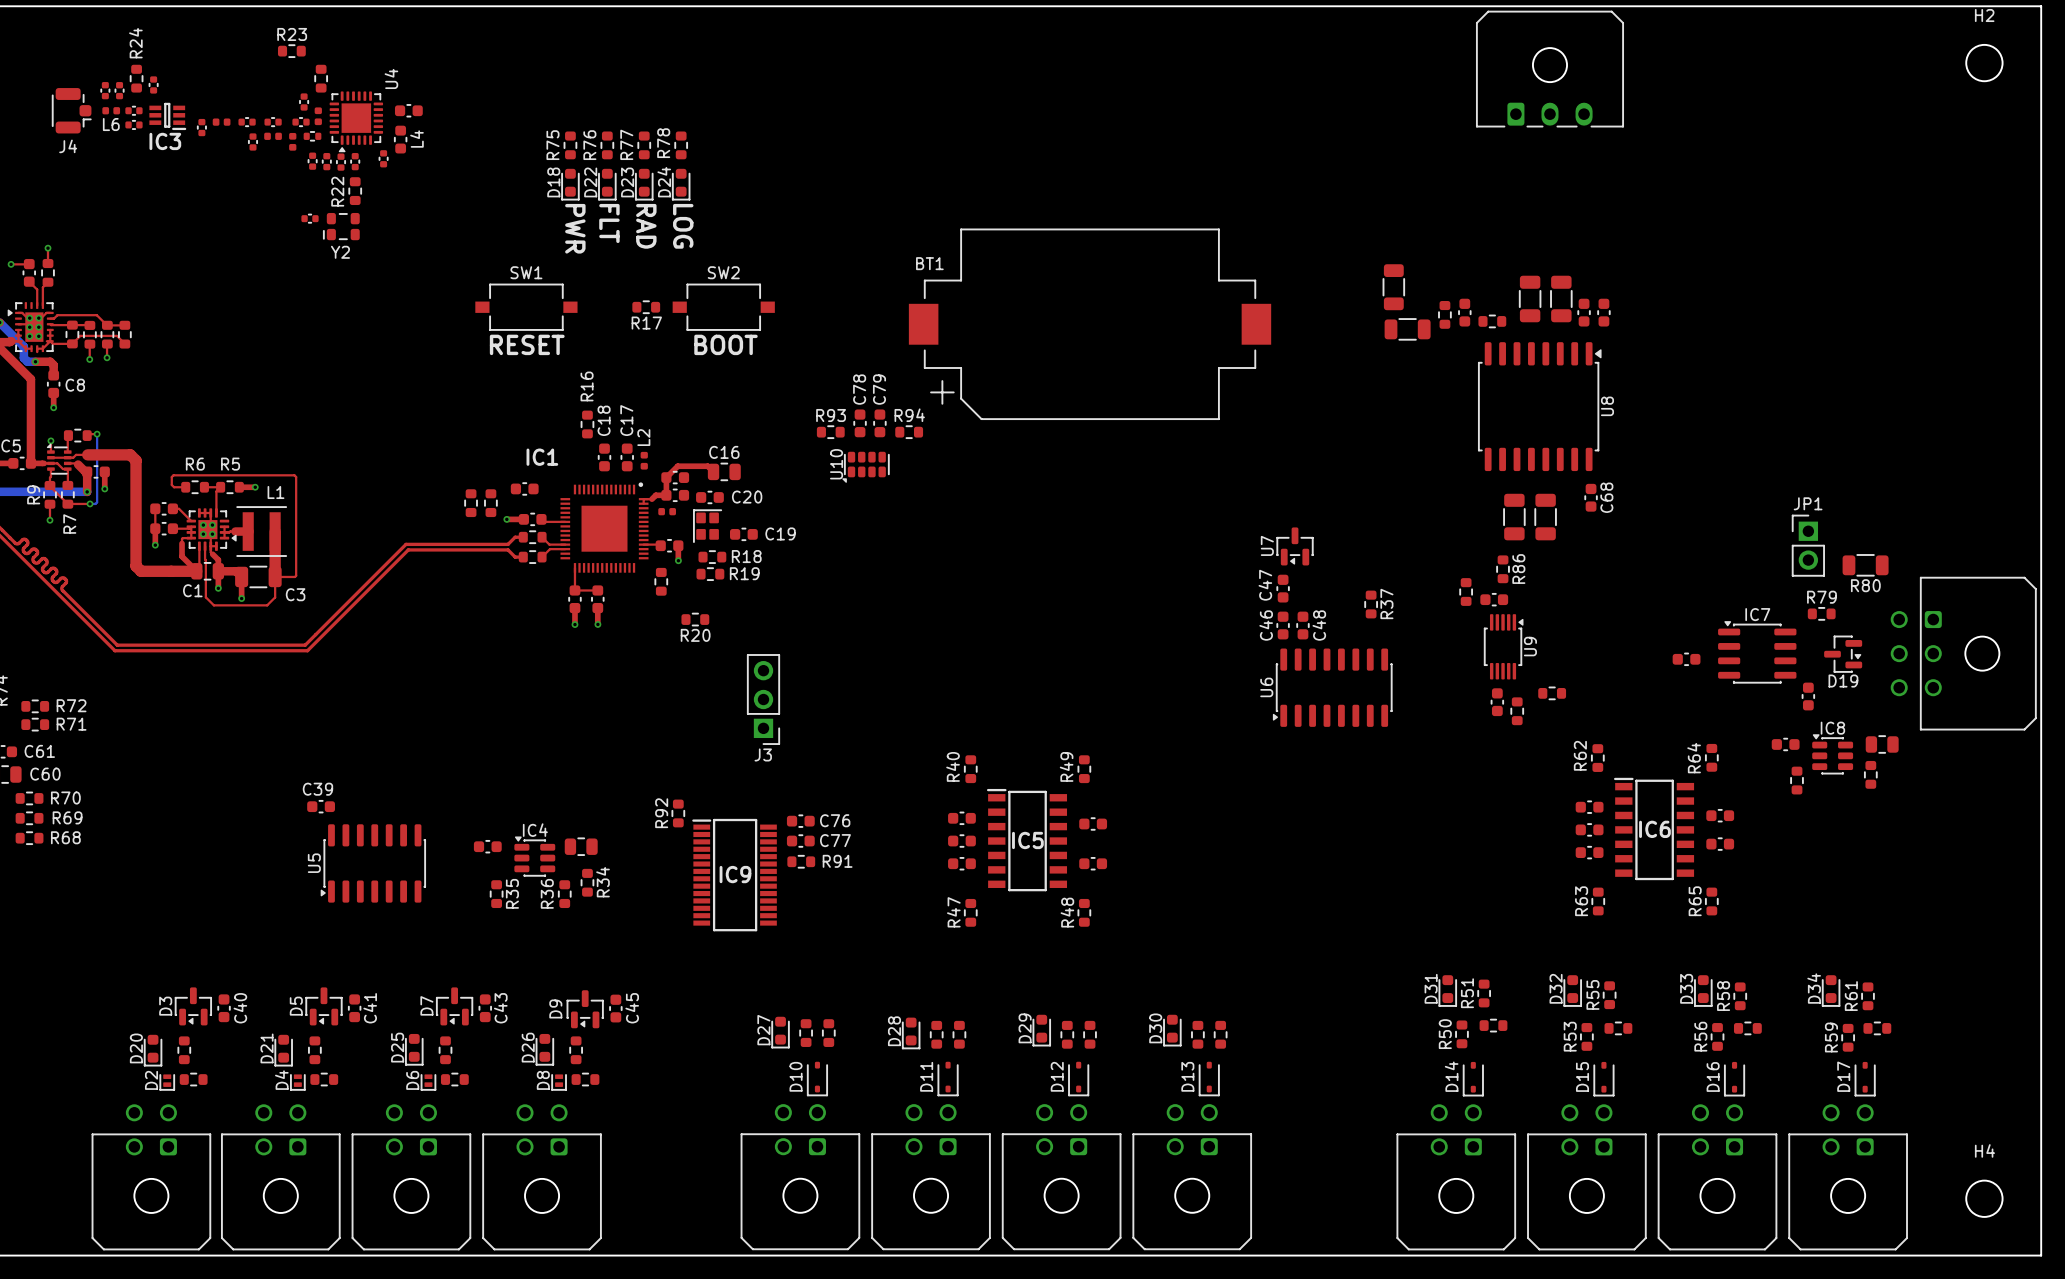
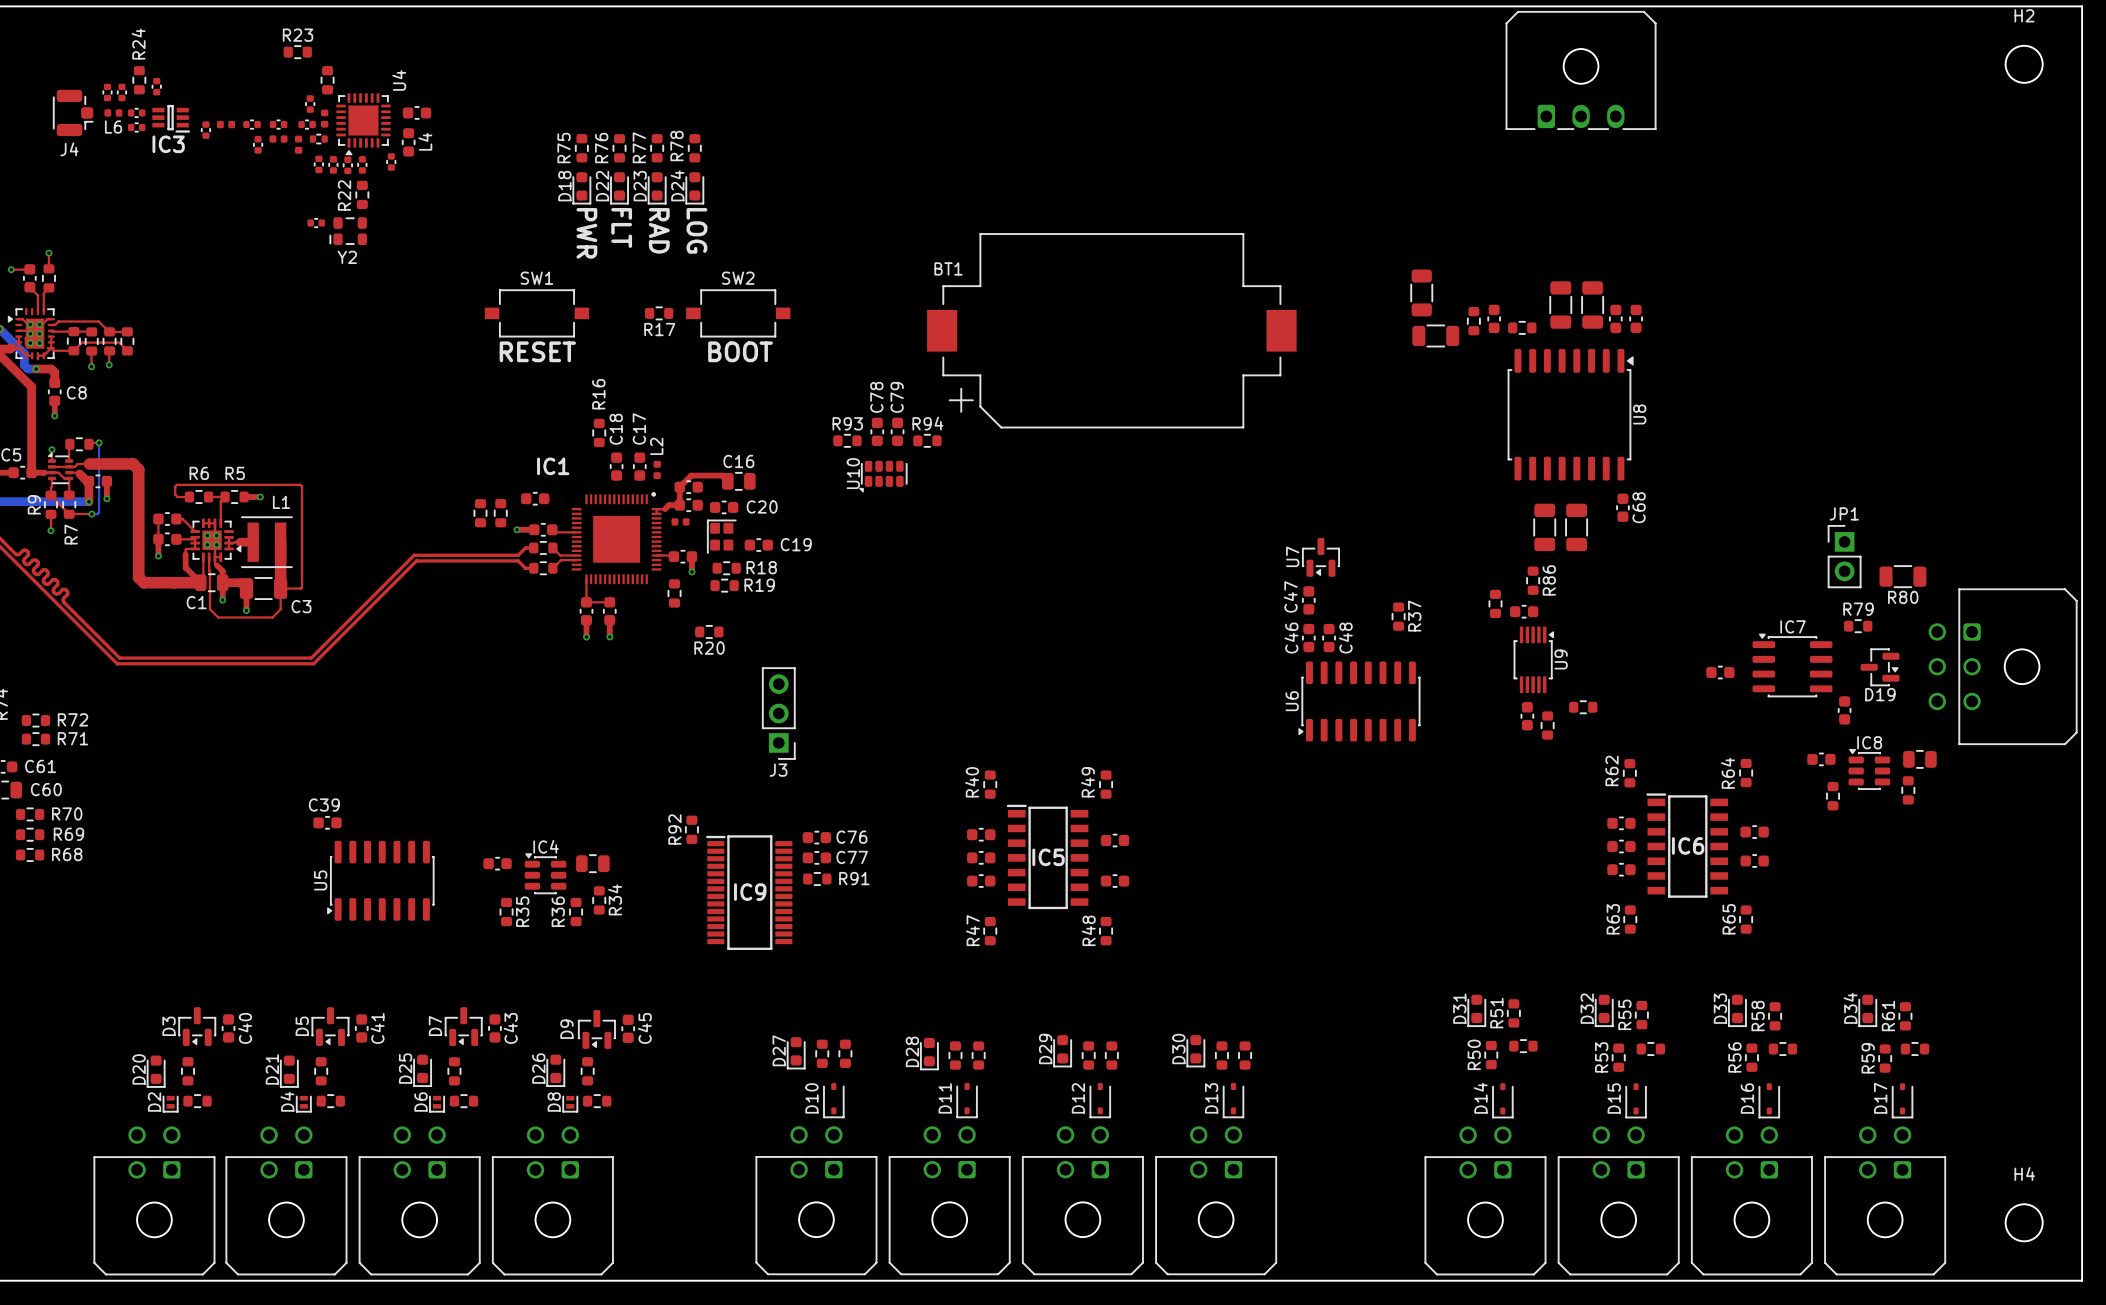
top track: none -> (25, 338) (25, 344)

